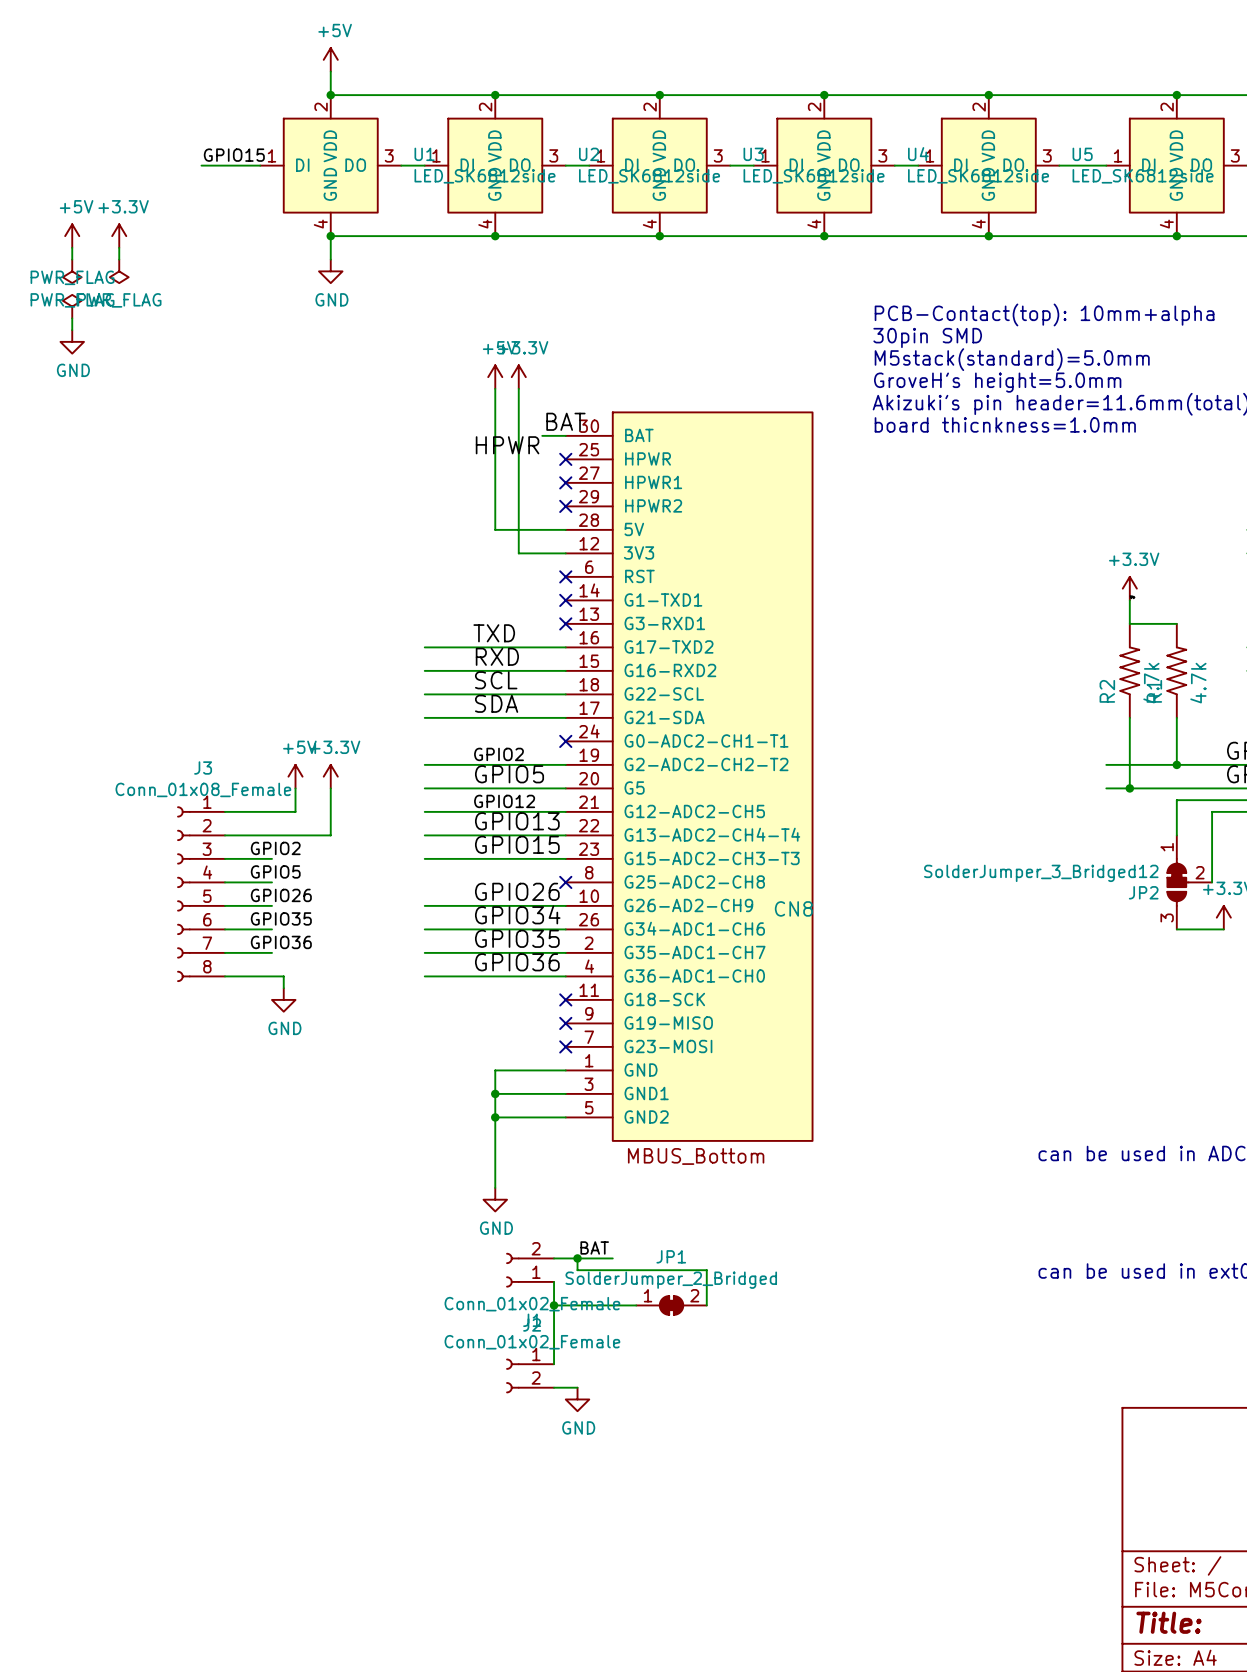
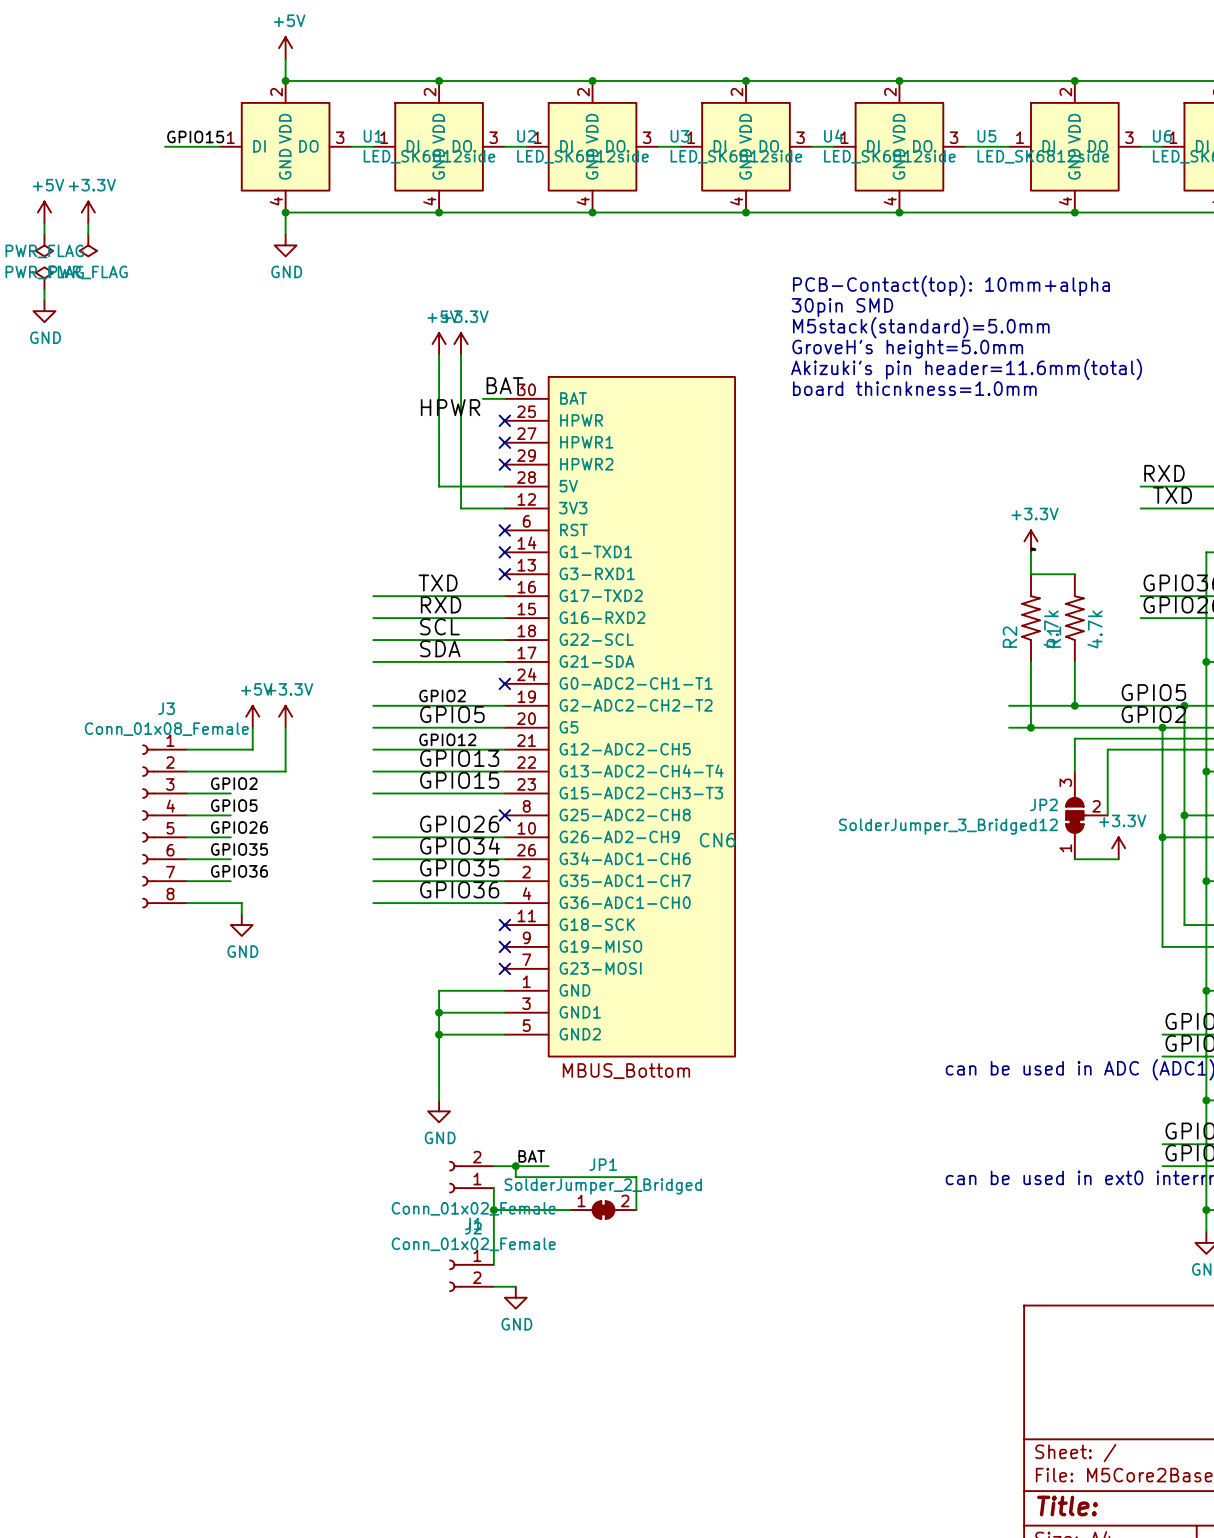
JP2 flip: as is (1178, 882) -> up-down (1075, 815)
CN8 name: CN8 (793, 908) -> CN6 (717, 840)

